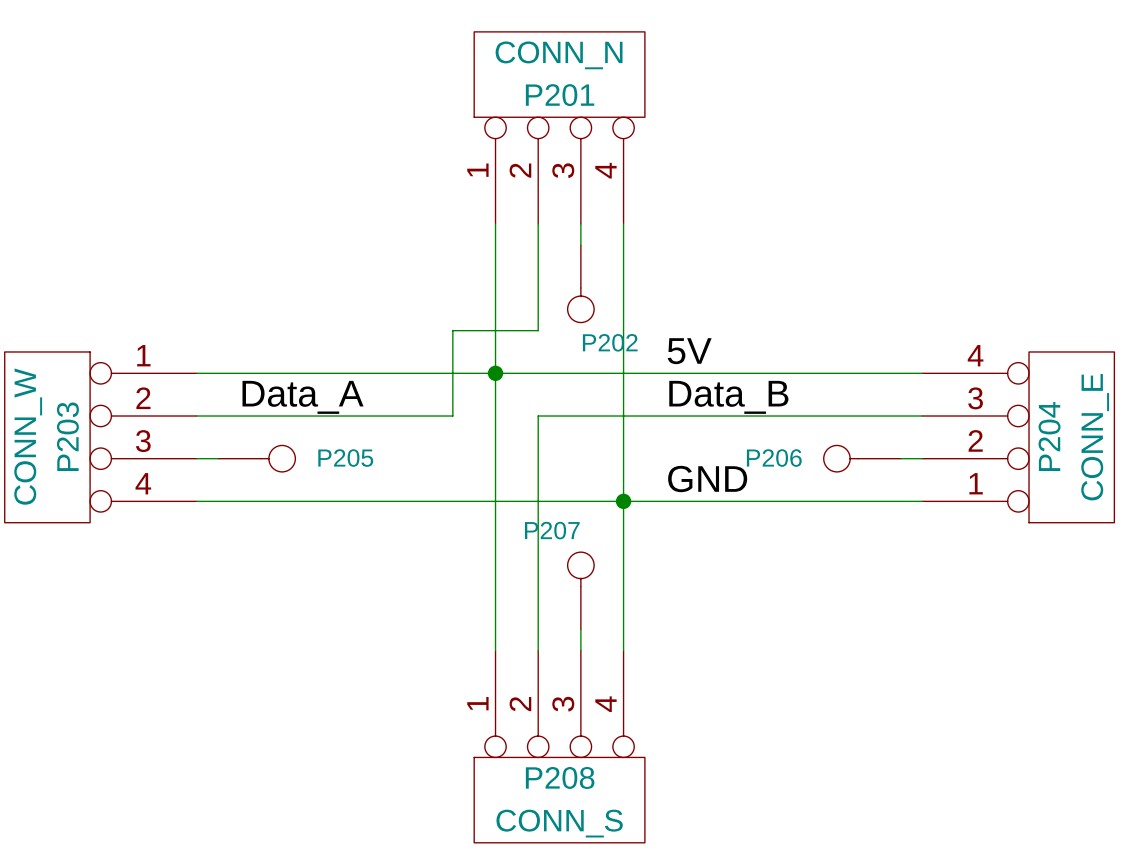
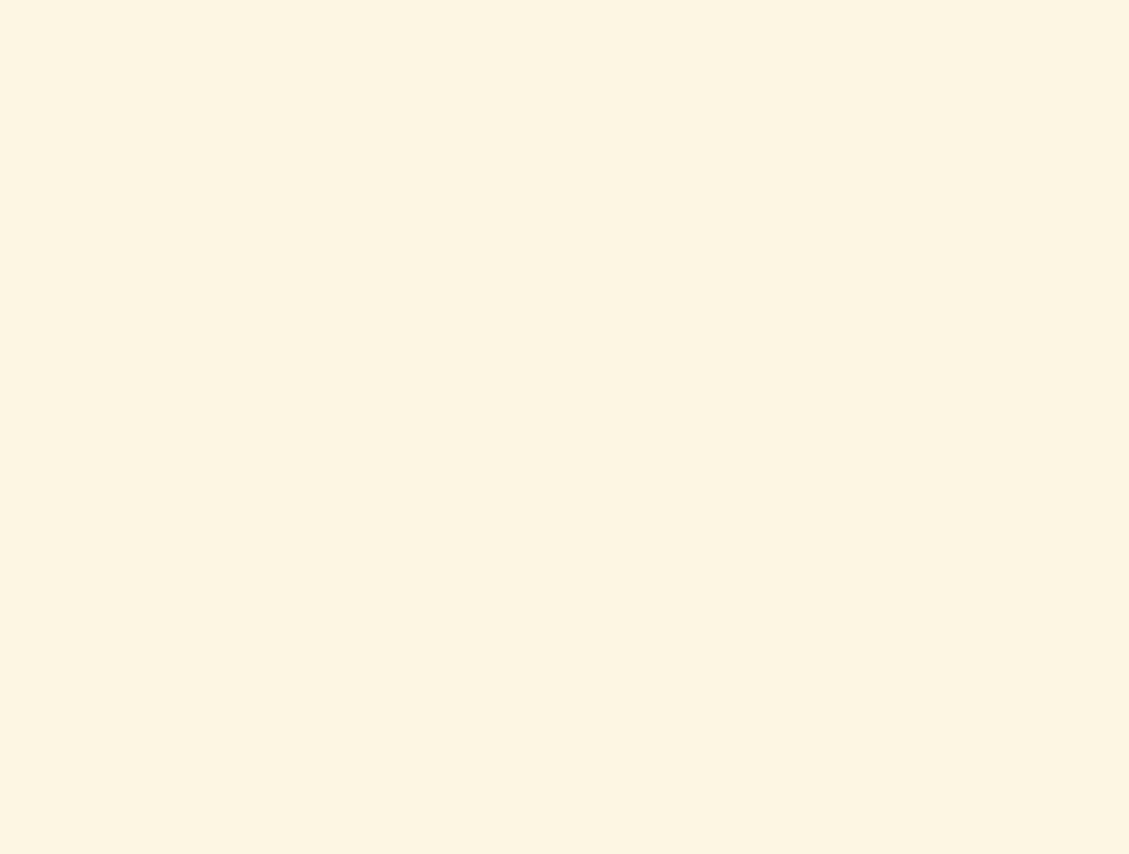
P201: CONN_N (559, 127) -> none
wire: (495, 223) (495, 650) -> none
wire: (538, 223) (538, 330) (452, 330) (452, 416) (196, 416) -> none
wire: (580, 223) (580, 245) -> none
wire: (623, 223) (623, 650) -> none
P202: (580, 283) -> none
label: 5V (689, 351) -> none
wire: (196, 373) (922, 373) -> none
junction: (495, 373) -> none
label: Data_A (303, 397) -> none
label: Data_B (728, 397) -> none
wire: (922, 416) (538, 416) (538, 650) -> none
P203: CONN_W (100, 437) -> none
P204: CONN_E (1018, 437) -> none
wire: (196, 458) (218, 458) -> none
P205: (256, 458) -> none
P206: (862, 458) -> none
wire: (900, 458) (922, 458) -> none
label: GND (707, 479) -> none
wire: (196, 501) (922, 501) -> none
junction: (623, 501) -> none
P207: (580, 590) -> none
wire: (580, 629) (580, 650) -> none
P208: CONN_S (559, 746) -> none

